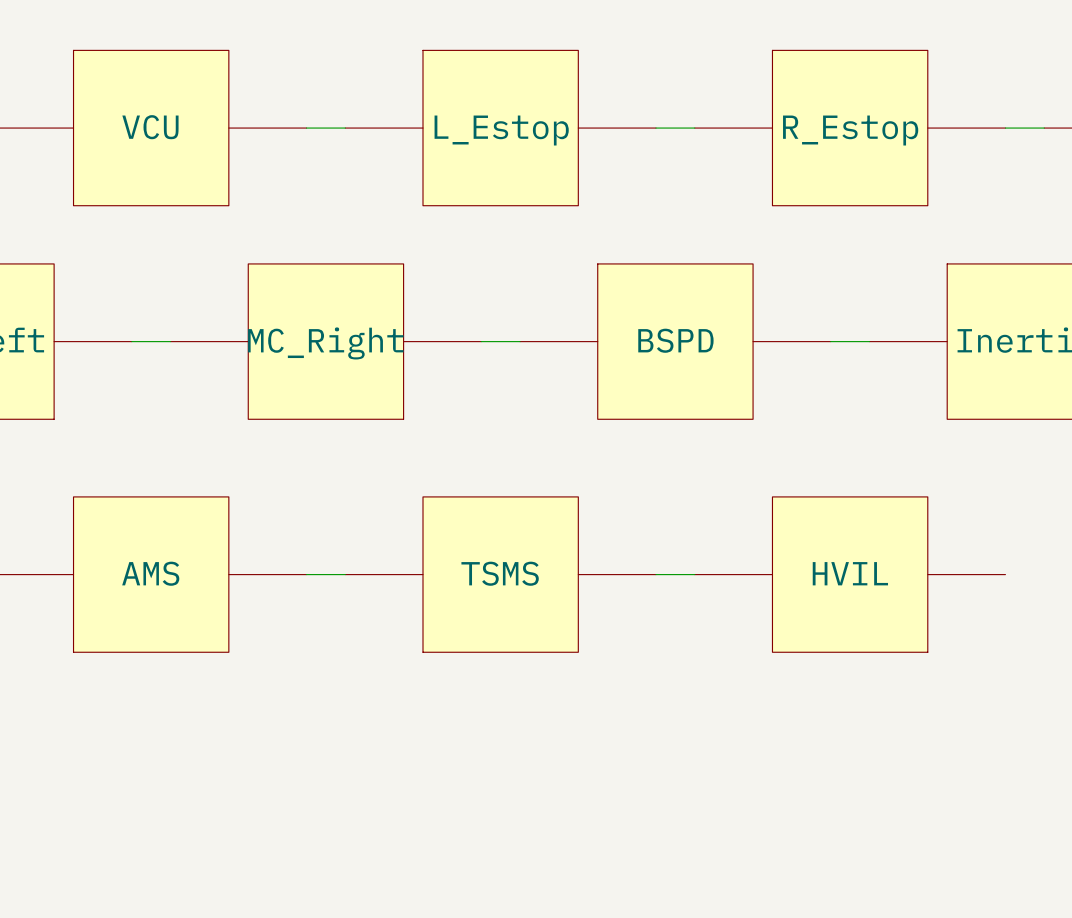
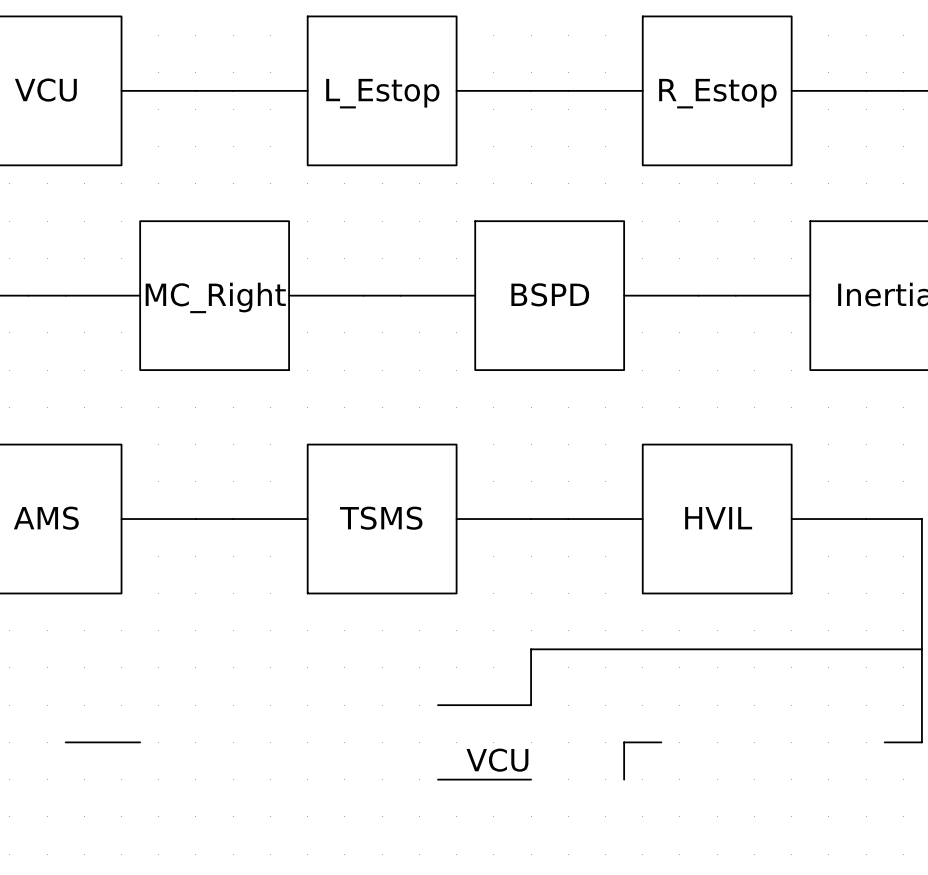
wire: none -> (866, 519) (921, 519) (921, 742) (884, 742)
wire: none -> (921, 649) (531, 649) (531, 705) (437, 705)
wire: none -> (65, 742) (140, 742)
wire: none -> (661, 742) (624, 742) (624, 779)
label: none -> VCU (497, 760)
wire: none -> (437, 779) (531, 779)

